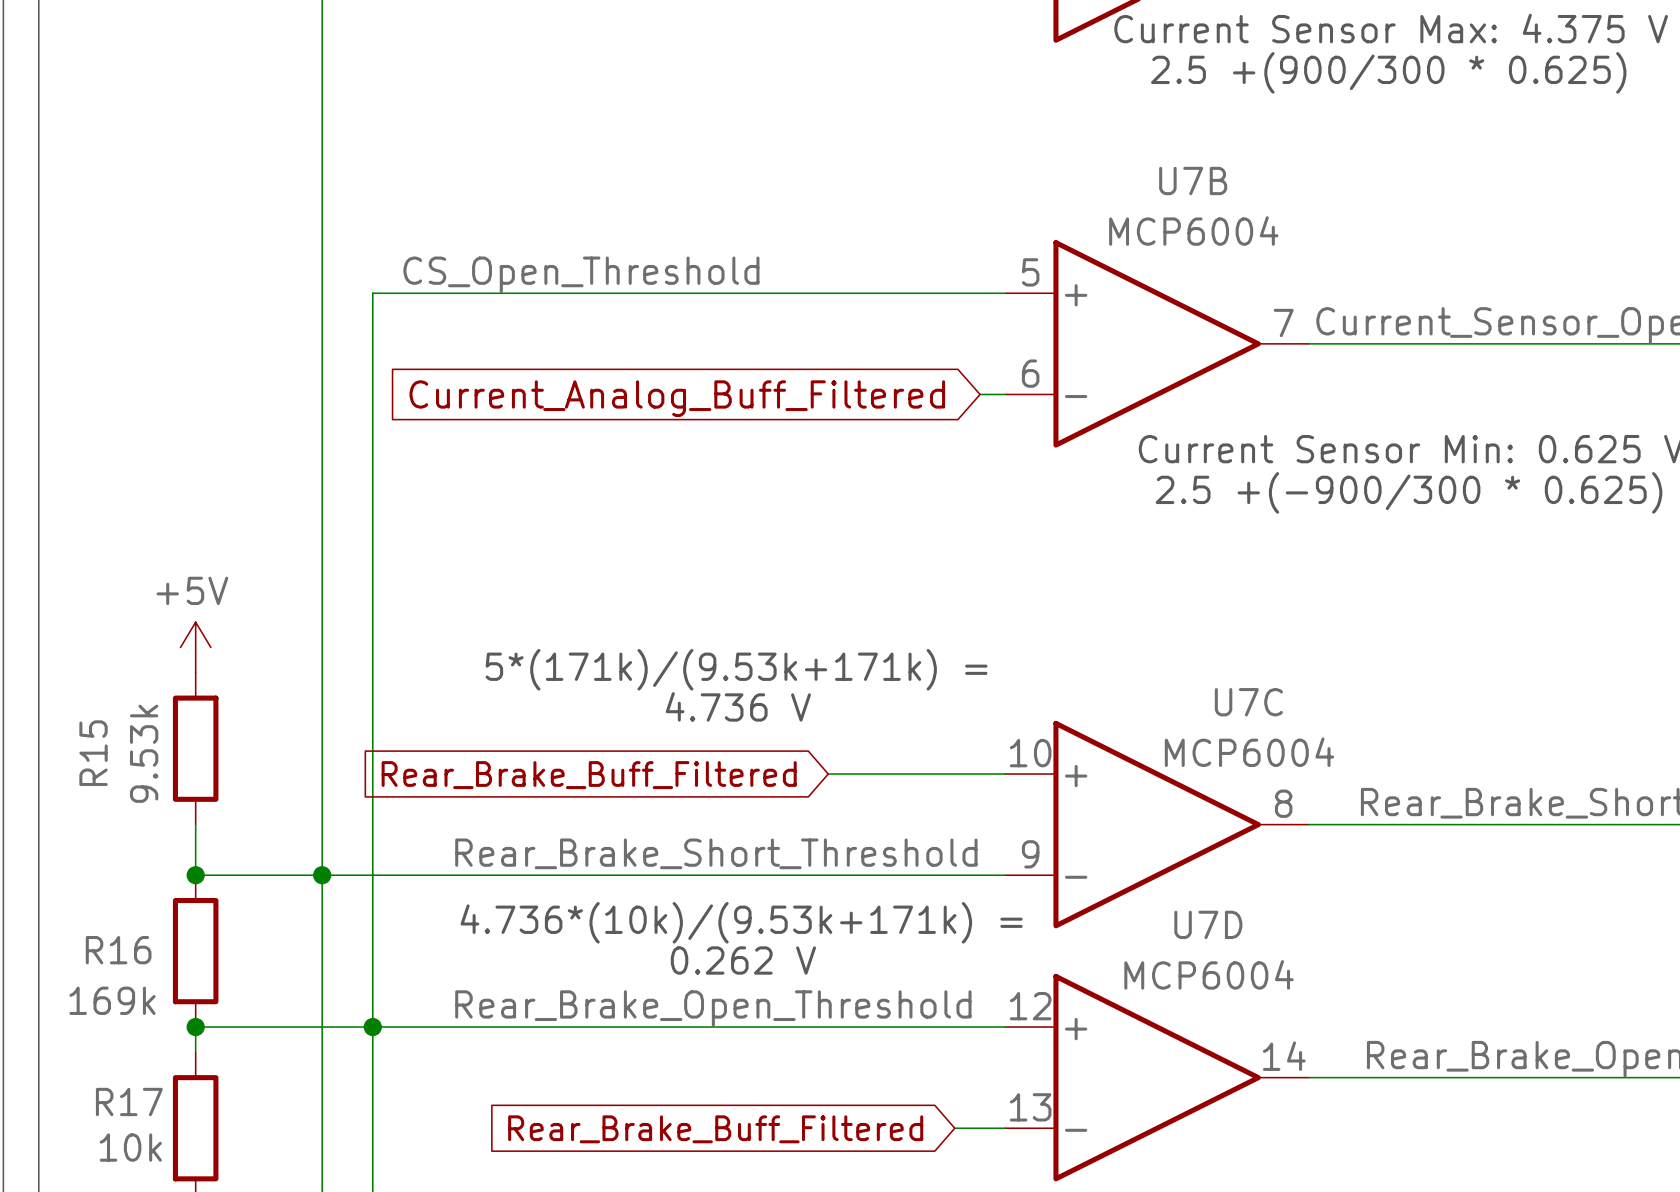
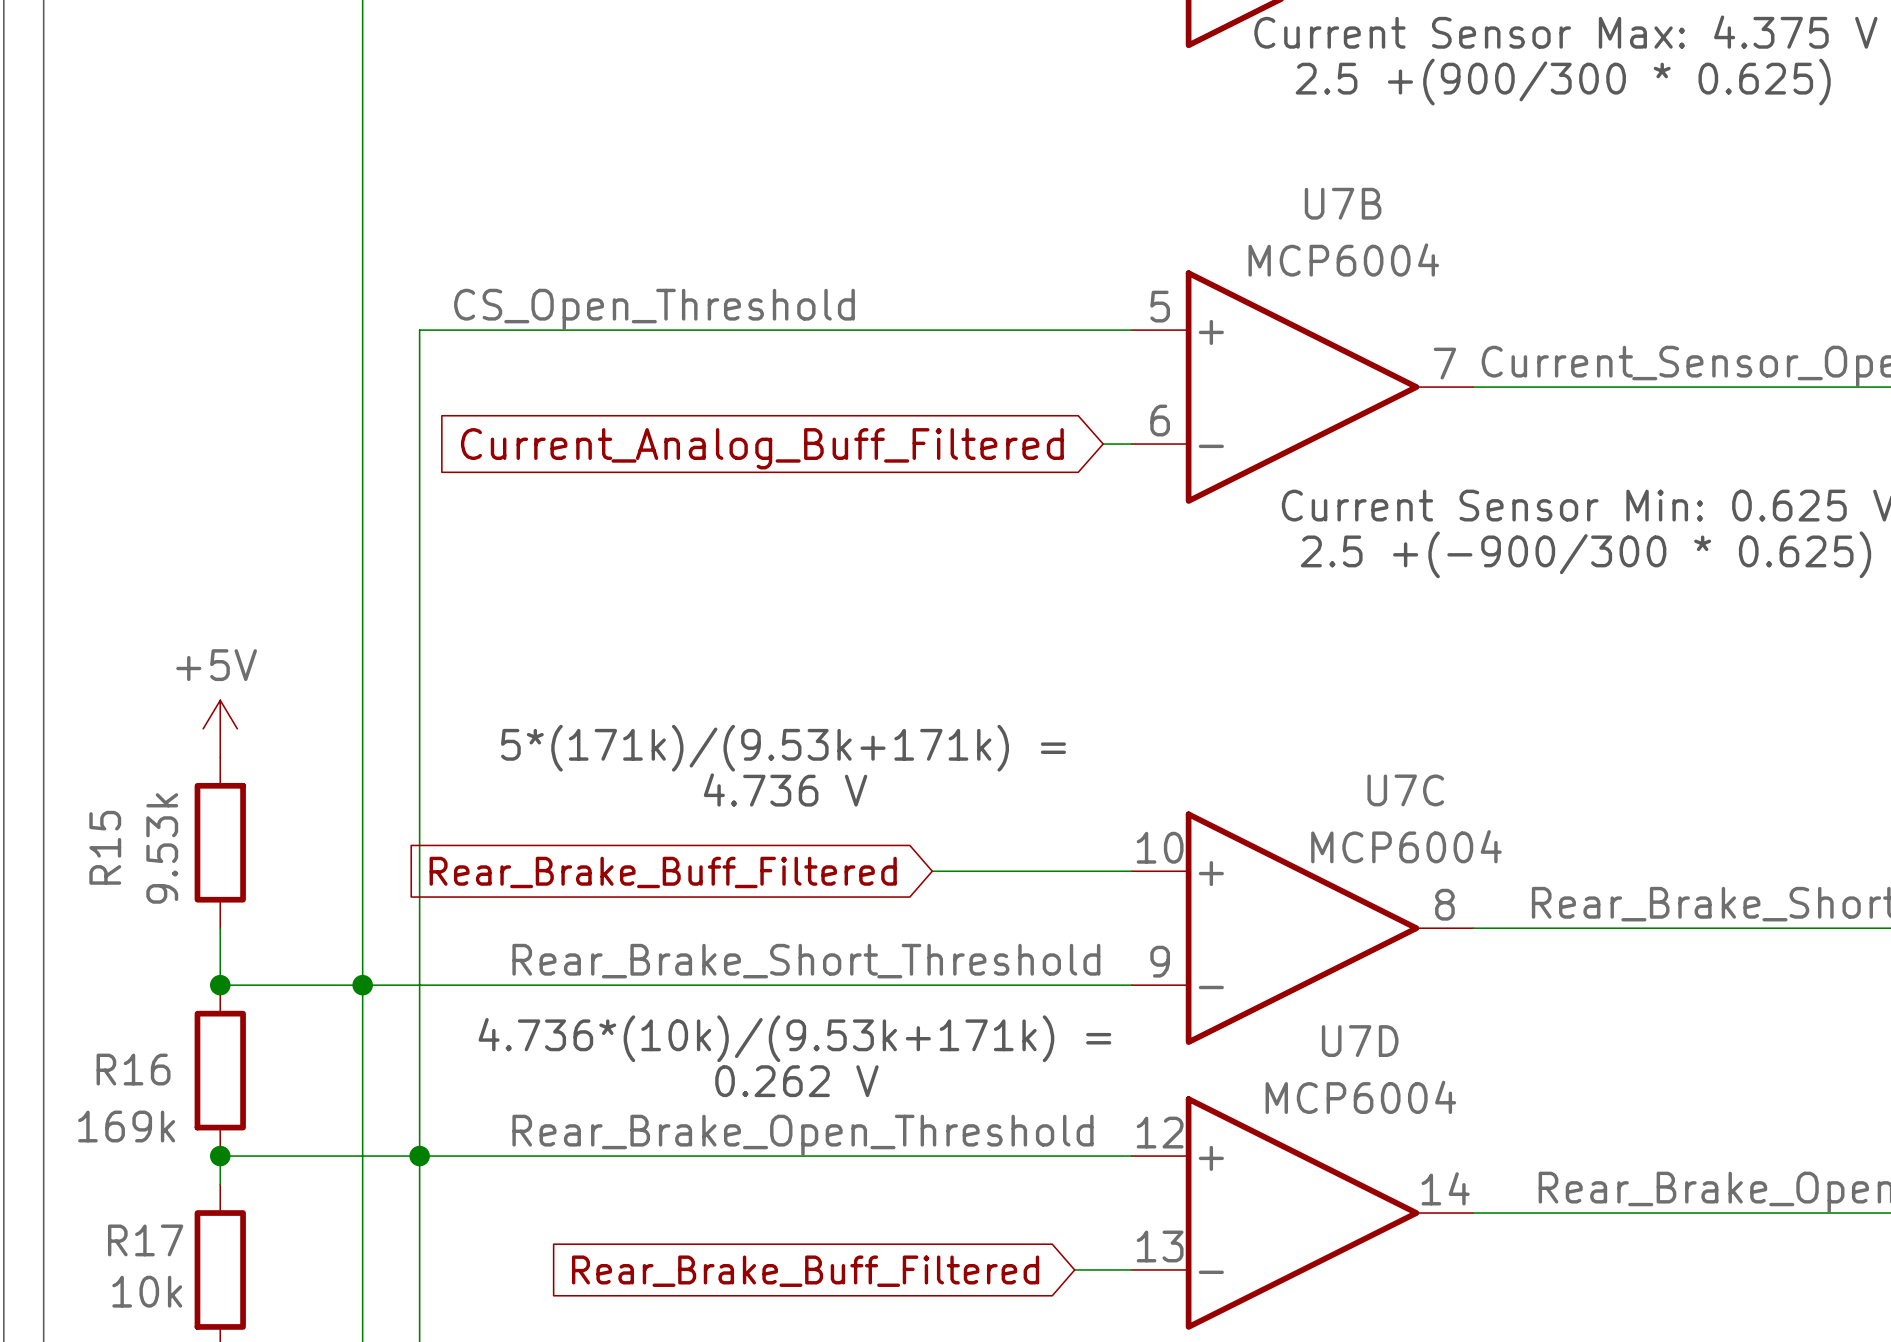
text position: 5*(171k)/(9.53k+171k) = (736, 669) -> 5*(171k)/(9.53k+171k) = (783, 748)
text position: 4.736 V (738, 706) -> 4.736 V (785, 789)
text position: 4.736*(10k)/(9.53k+171k) = (741, 922) -> 4.736*(10k)/(9.53k+171k) = (794, 1038)
text position: 0.262 V (743, 960) -> 0.262 V (796, 1081)

